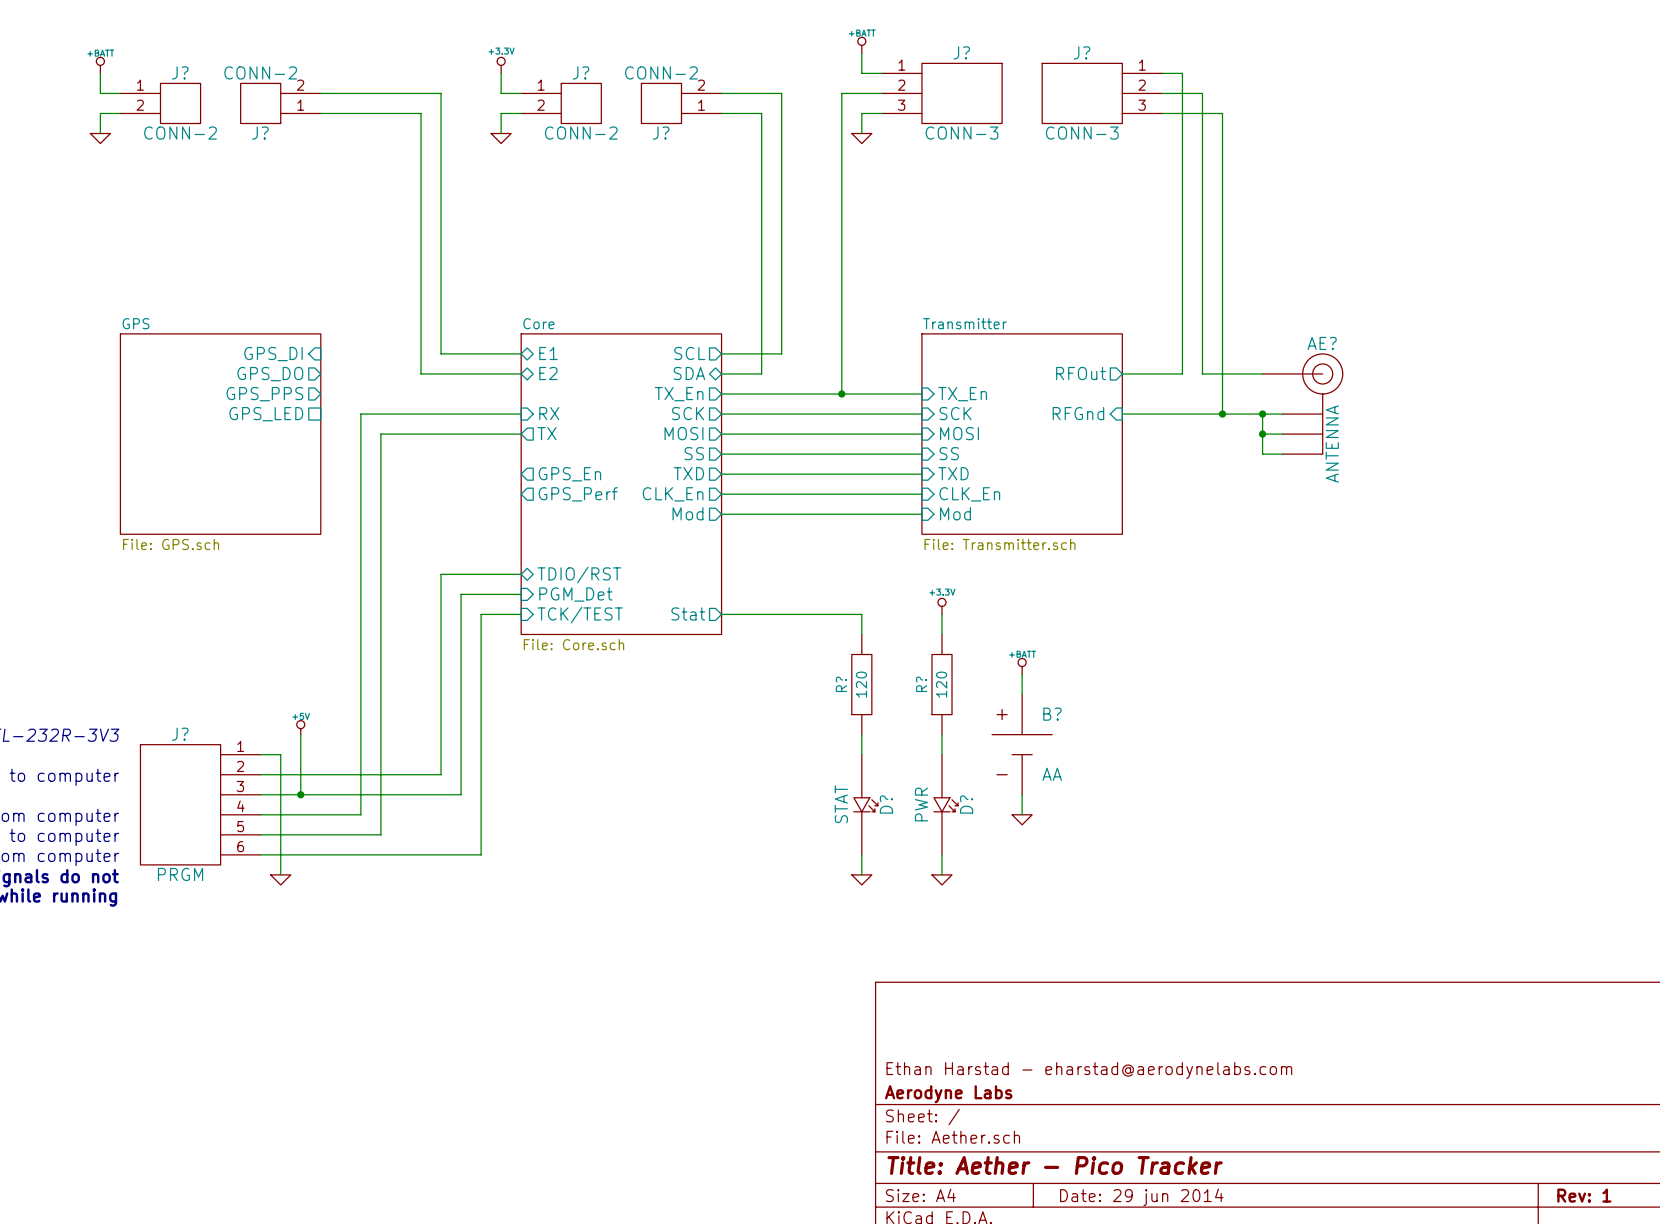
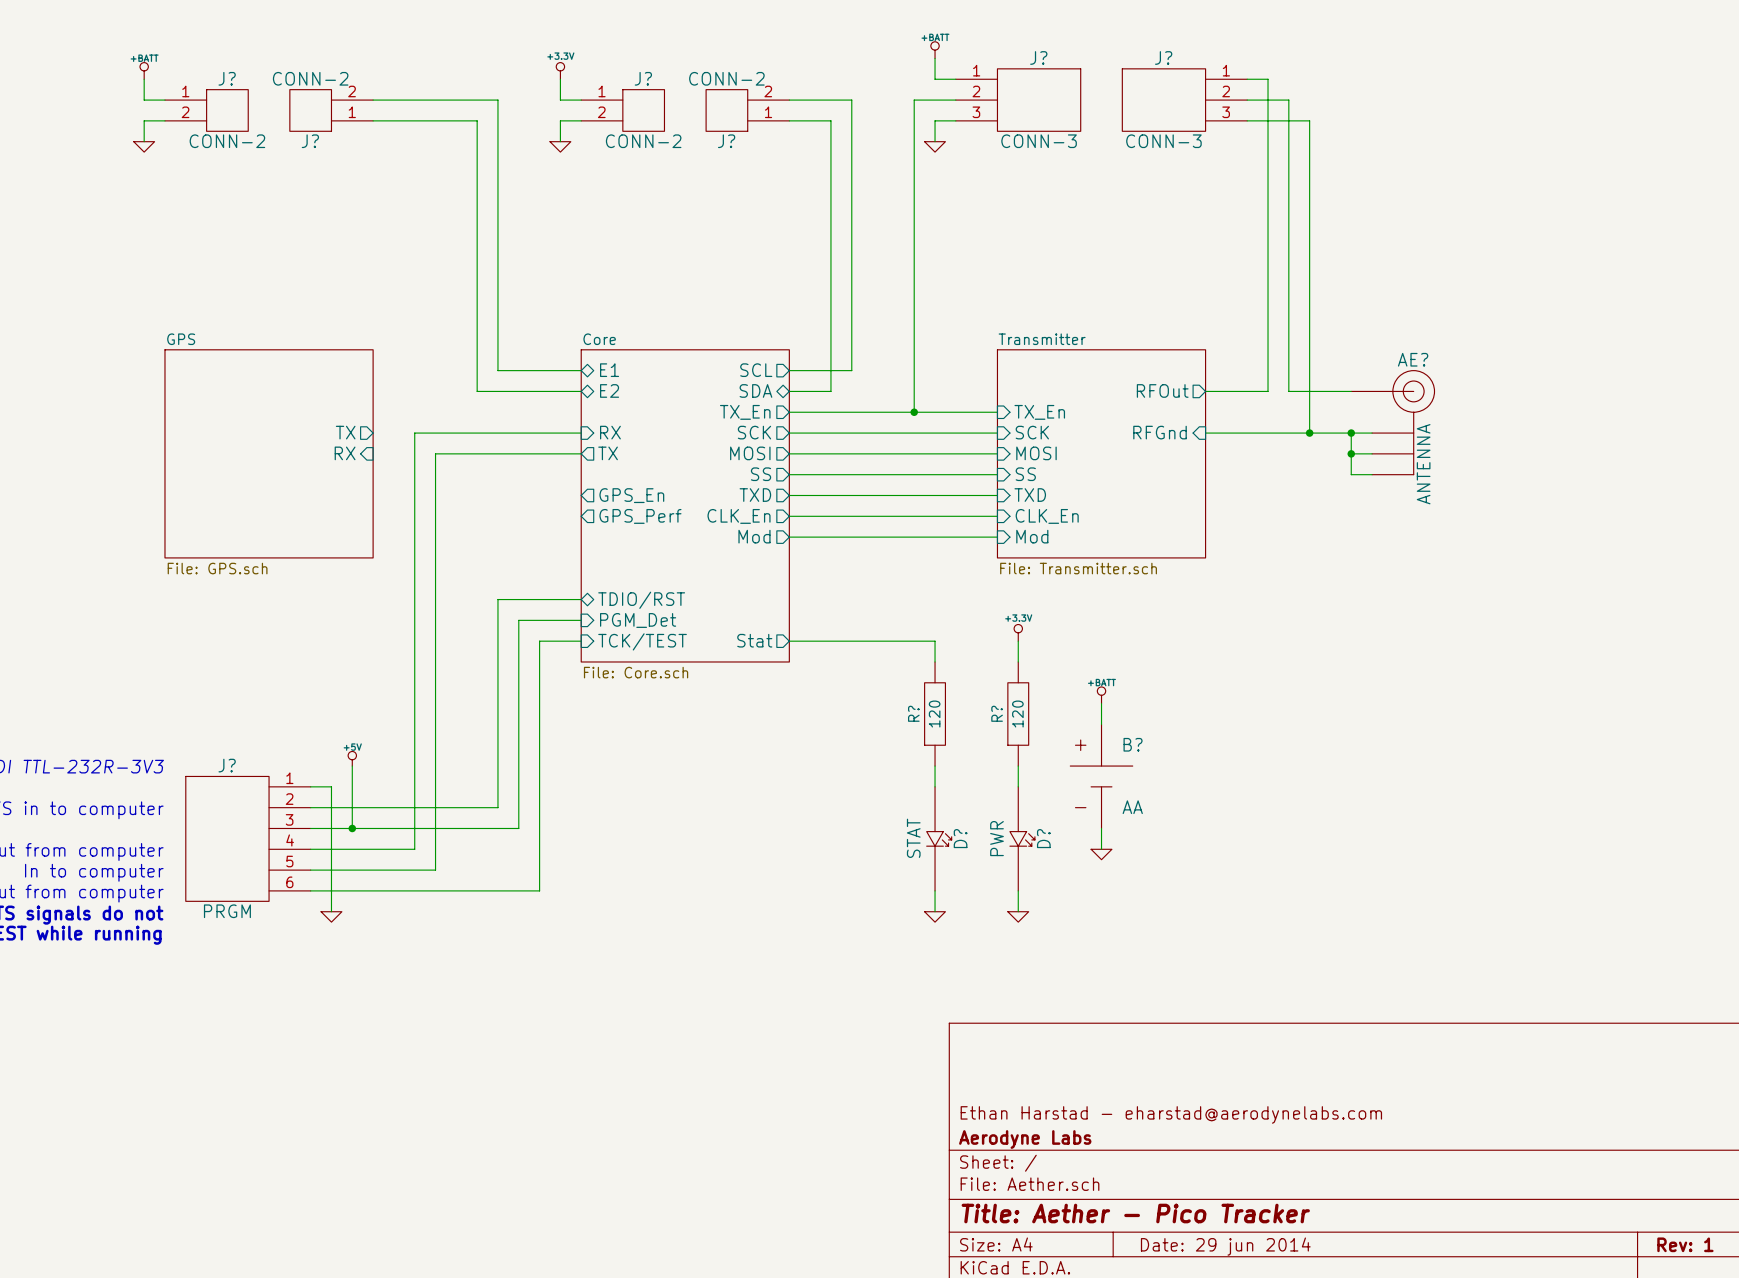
sheet pin: GPS_DI (273, 354) -> none
sheet pin: GPS_DO (270, 374) -> none
sheet pin: GPS_PPS (264, 394) -> none
sheet pin shape: passive (266, 414) -> output (345, 432)
sheet pin: GPS_LED (266, 414) -> TX (345, 432)
sheet pin: none -> RX (345, 453)

